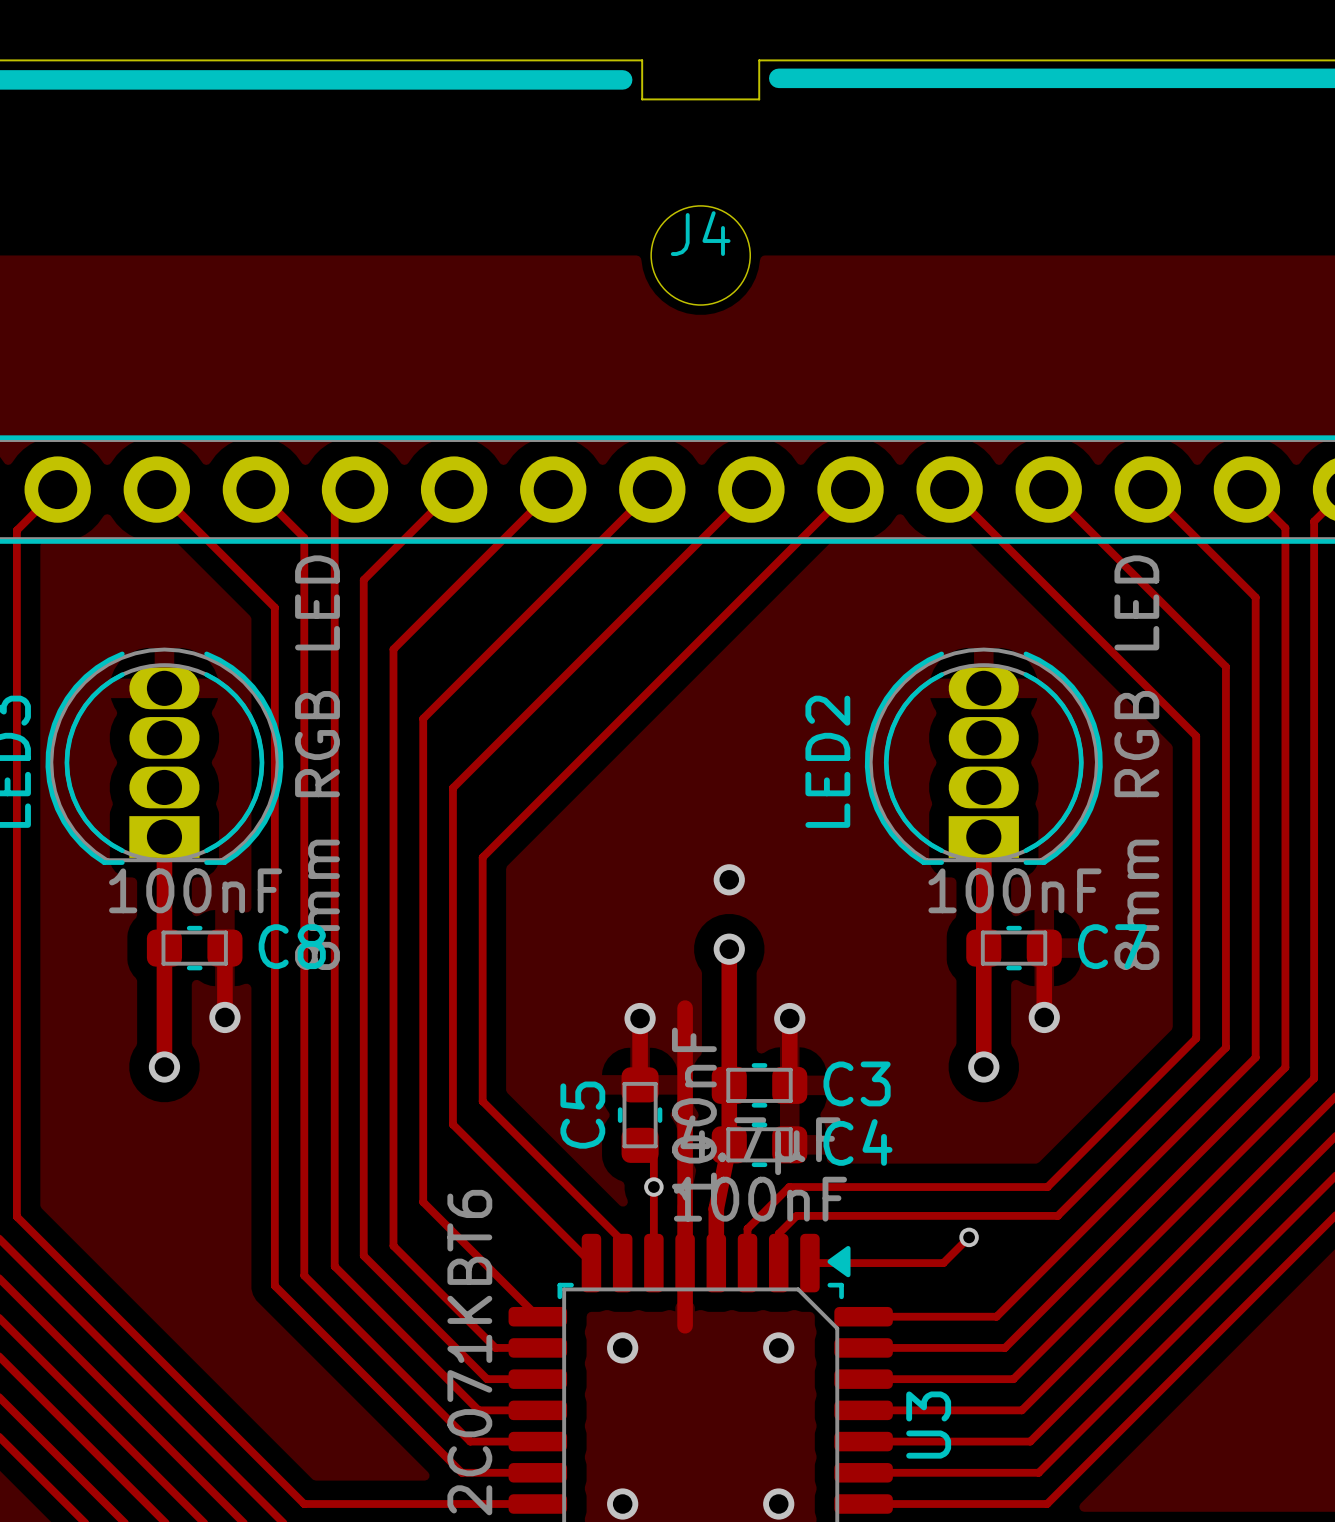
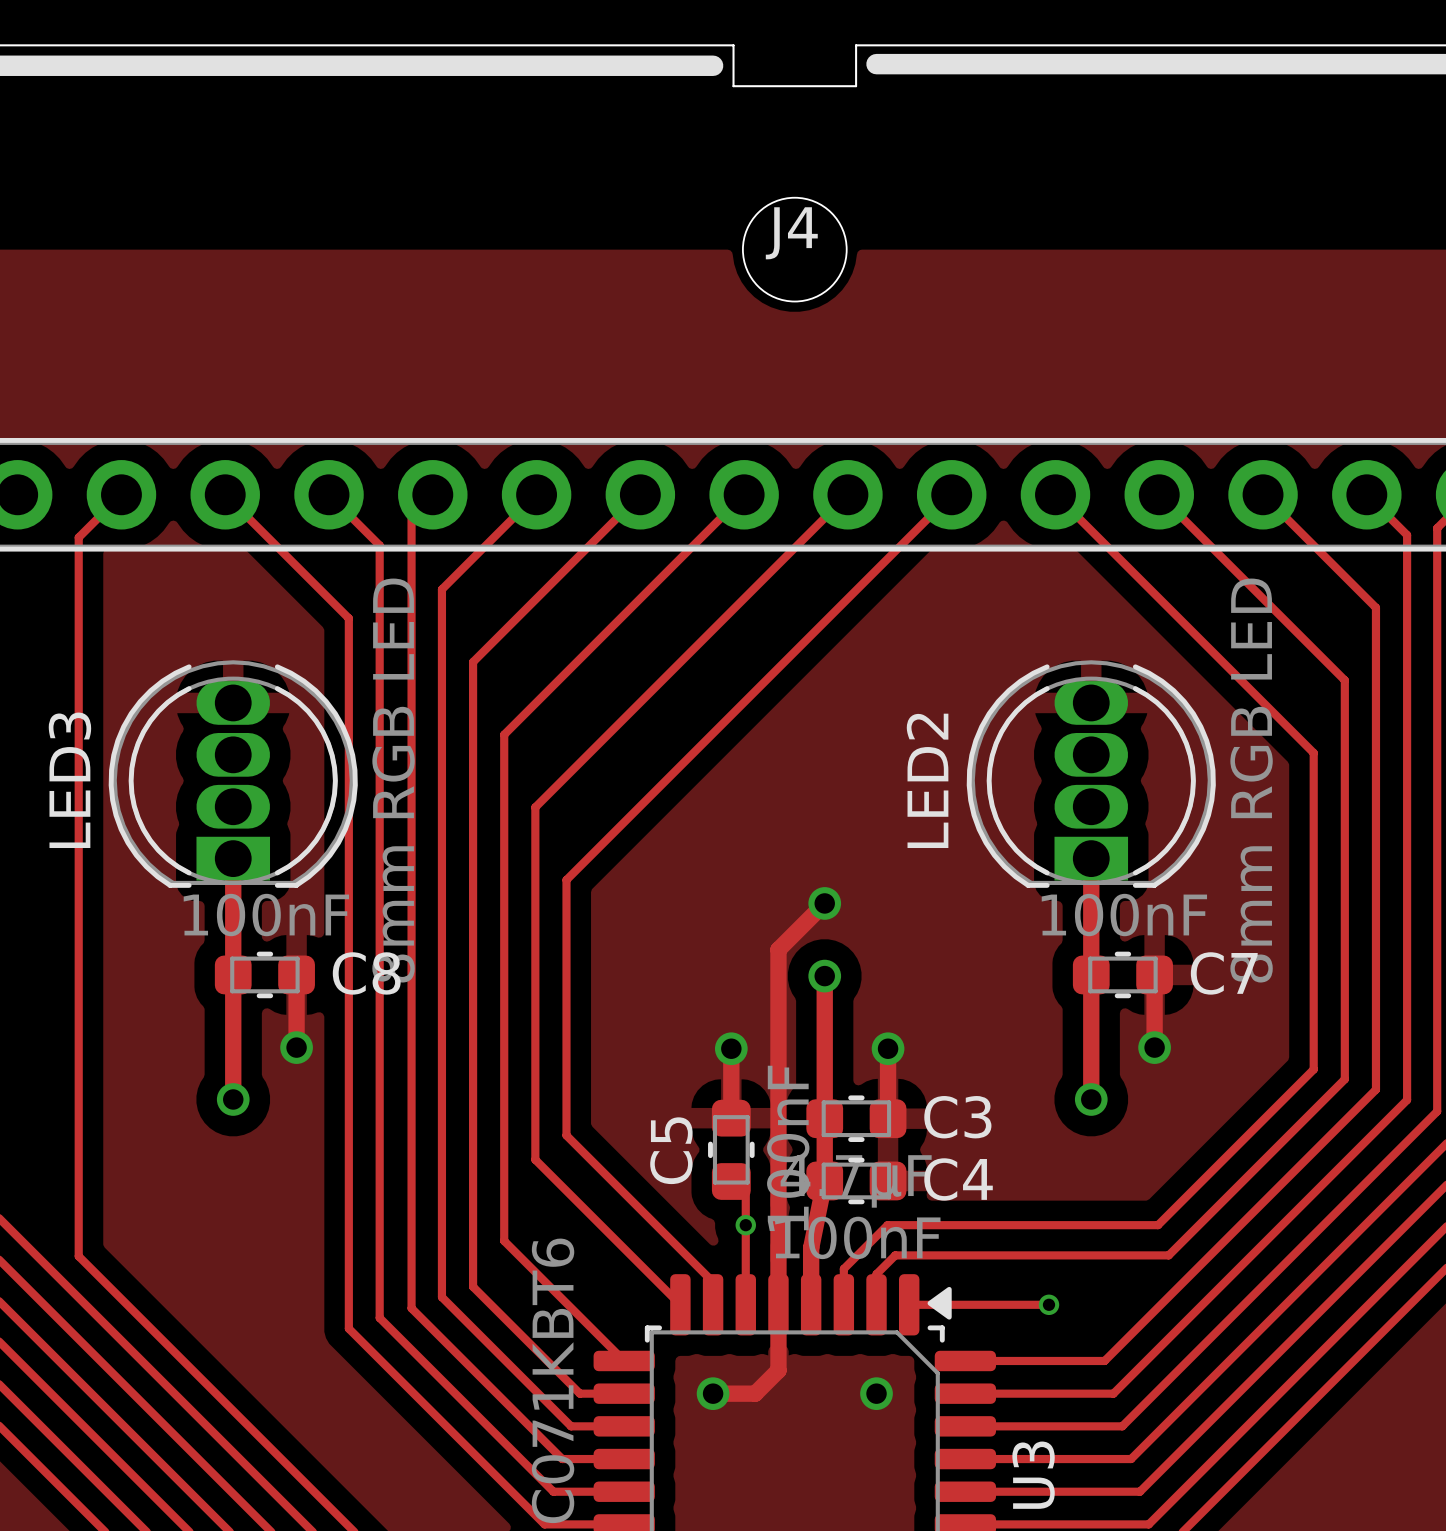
track: none -> (824, 903) (778, 949) (778, 1037)
track: (969, 1237) (943, 1263) -> none
via position: (969, 1237) -> (1048, 1304)
track: none -> (778, 1370) (755, 1393) (713, 1393)

